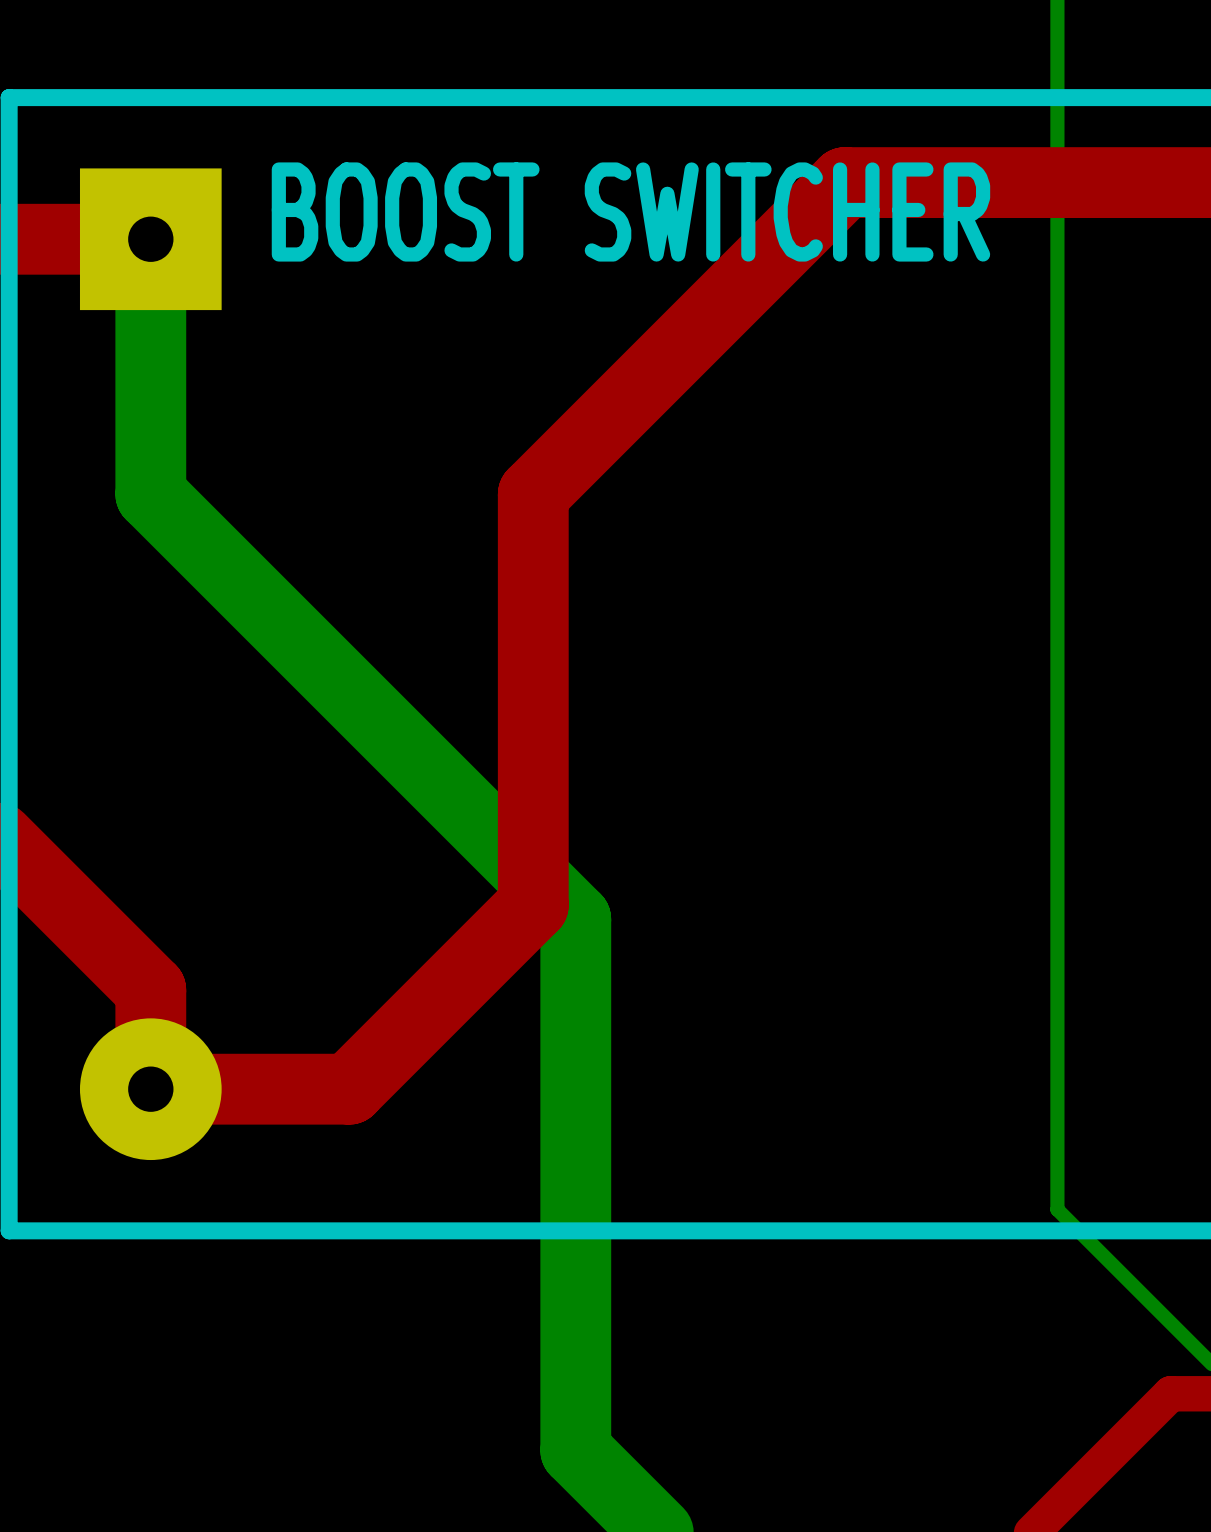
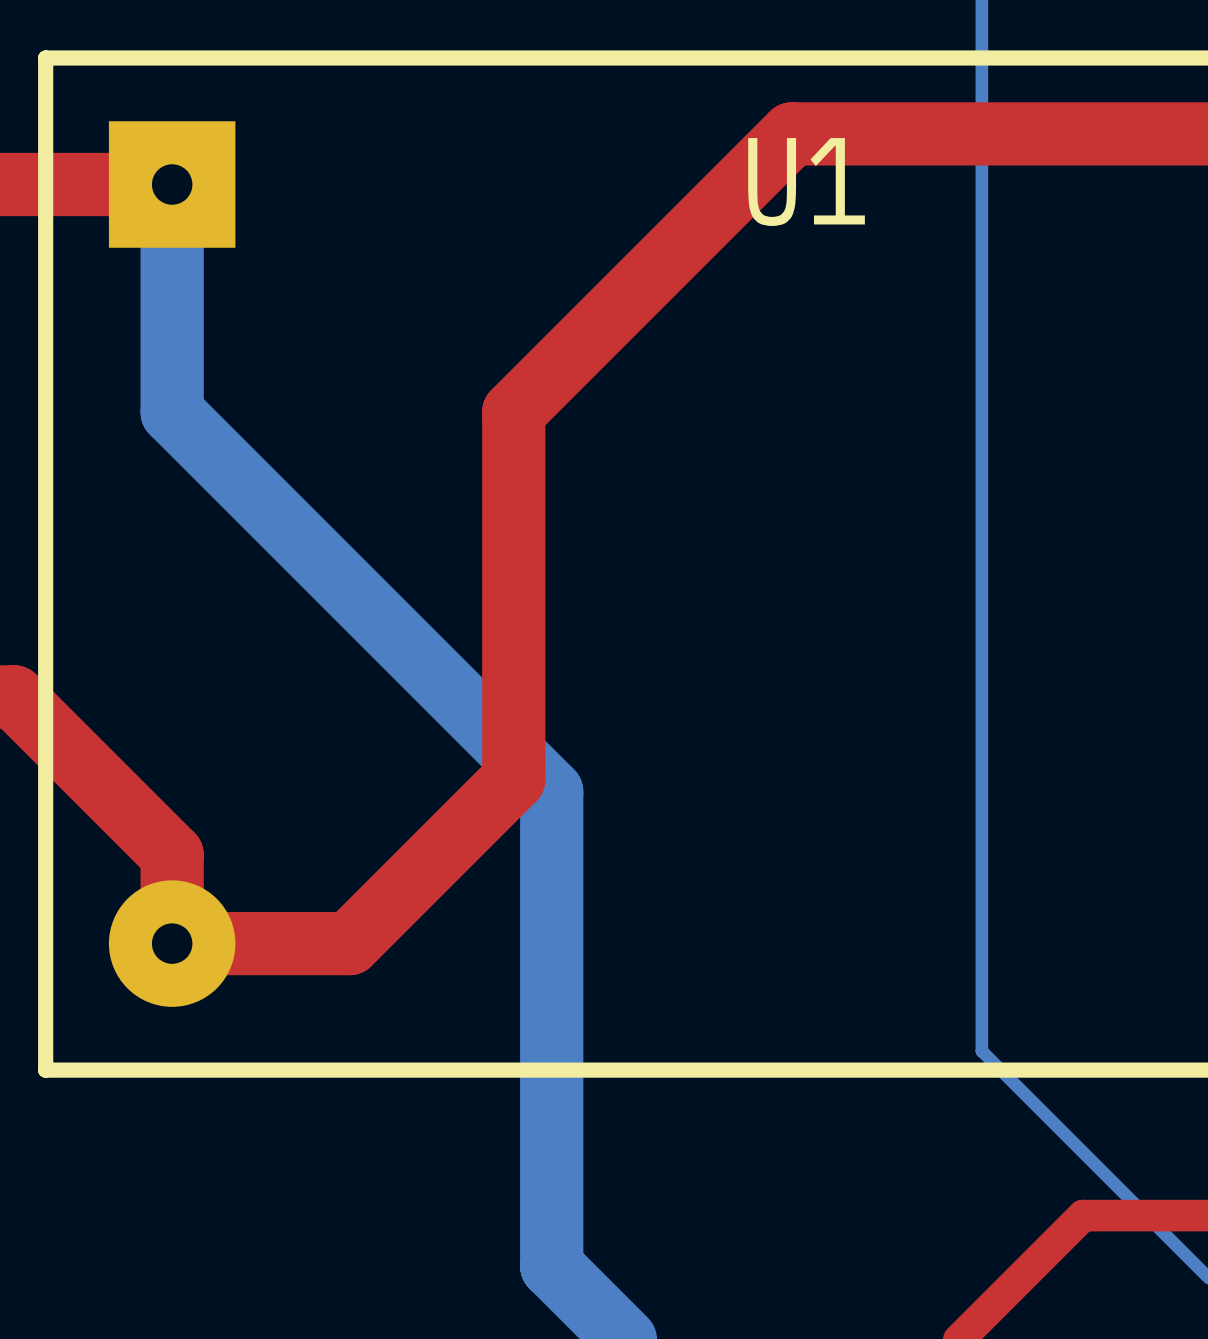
U1 value: BOOST SWITCHER (630, 211) -> none
U1 name: none -> U1 (806, 182)

